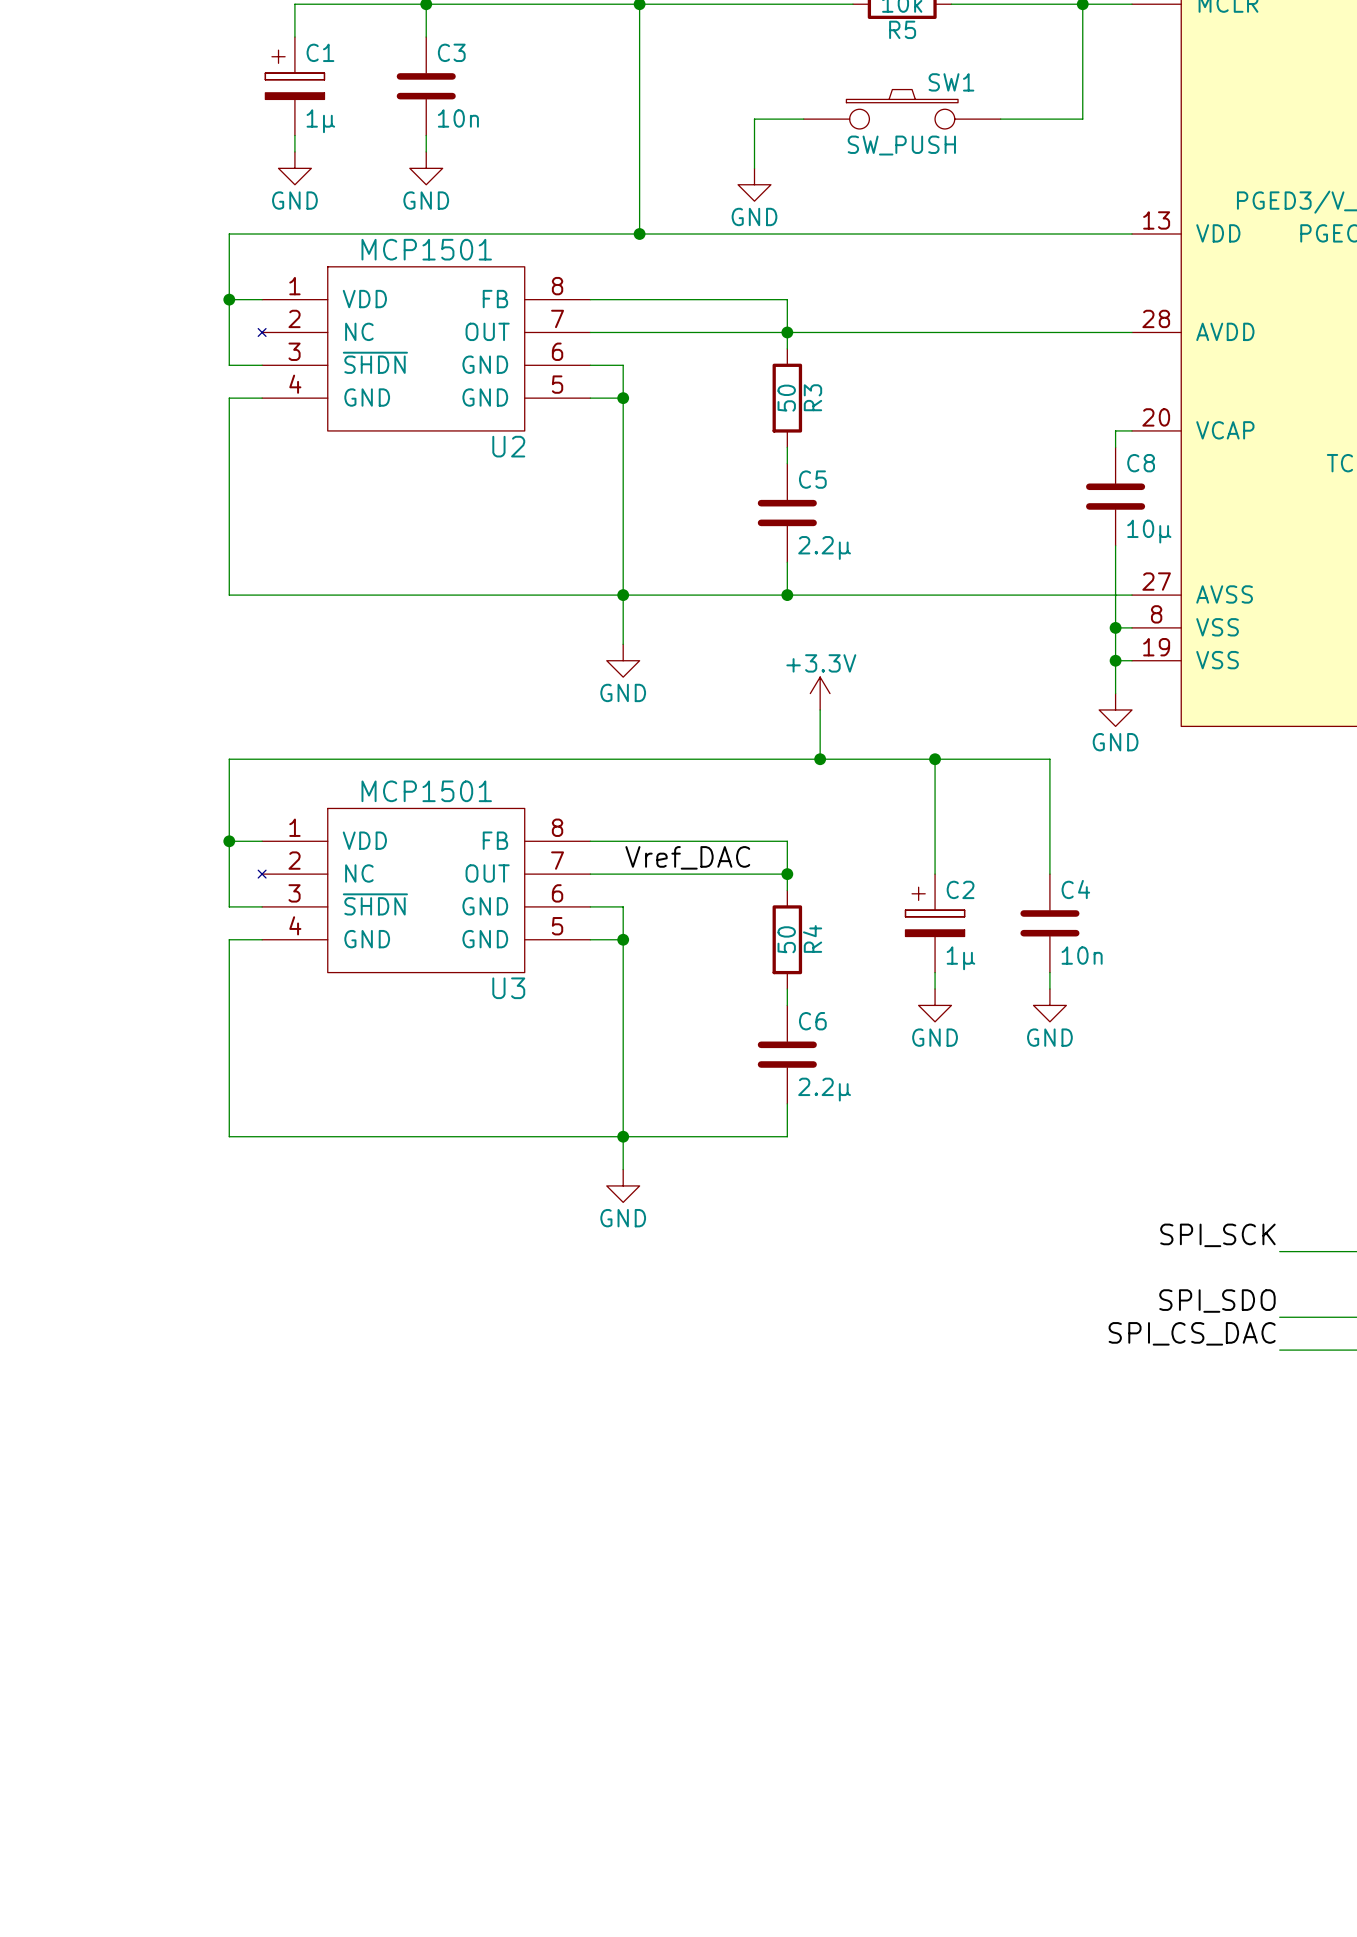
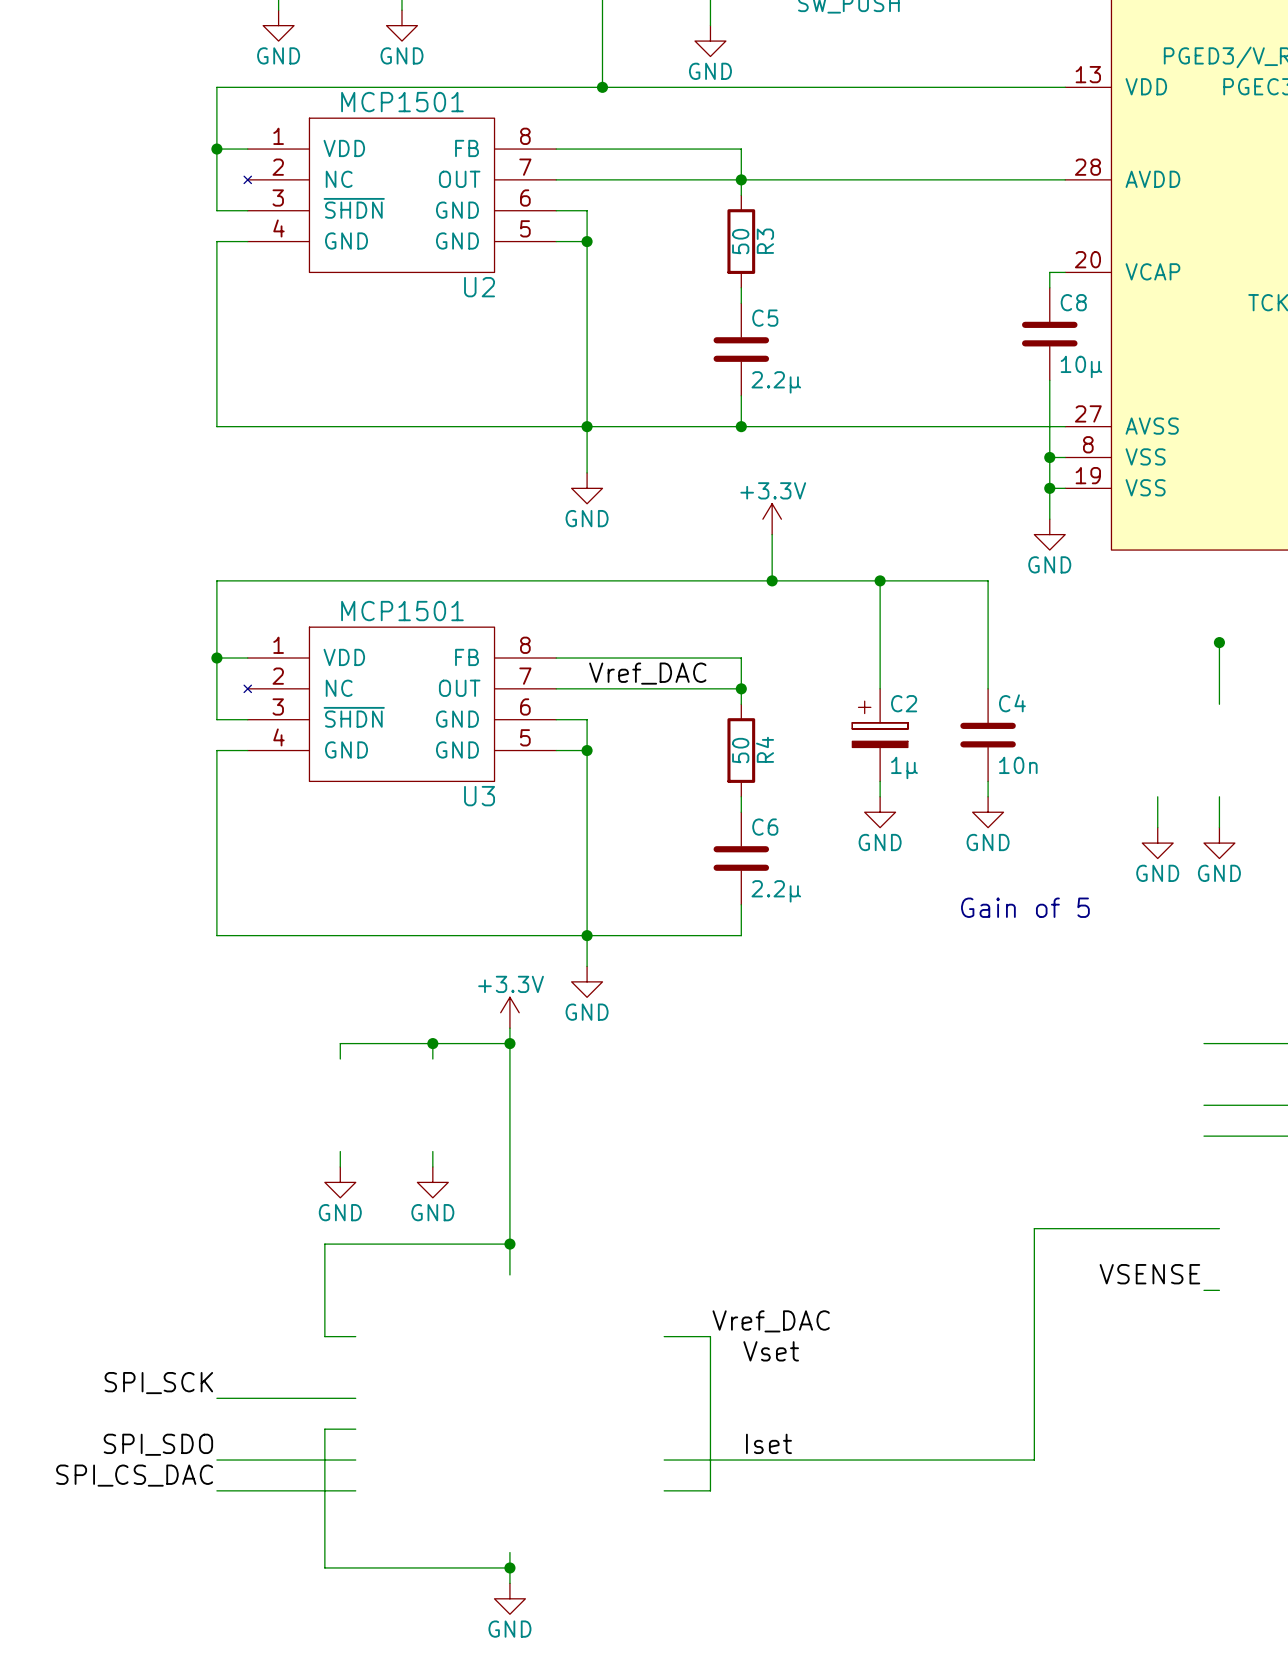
wire: none -> (1219, 642) (1219, 704)
junction: none -> (1219, 642)
wire: none -> (1157, 796) (1157, 827)
wire: none -> (1219, 796) (1219, 827)
power symbol: none -> GND (1157, 843)
power symbol: none -> GND (1219, 843)
text: none -> Gain of 5 (1025, 907)
power symbol: none -> +3.3V (509, 1012)
wire: none -> (509, 1028) (509, 1274)
label: SPI_SCK (1217, 1235) -> none
wire: none -> (432, 1043) (432, 1059)
junction: none -> (432, 1043)
wire: none -> (509, 1043) (340, 1043) (340, 1059)
junction: none -> (509, 1043)
label: SPI_SDO (1217, 1301) -> none
label: SPI_CS_DAC (1192, 1333) -> none
wire: none -> (340, 1151) (340, 1166)
wire: none -> (432, 1151) (432, 1166)
power symbol: none -> GND (340, 1182)
power symbol: none -> GND (432, 1182)
wire: none -> (1219, 1228) (1034, 1228) (1034, 1460) (664, 1460)
wire: none -> (509, 1244) (324, 1244) (324, 1336) (355, 1336)
junction: none -> (509, 1244)
label: none -> VSENSE (1149, 1274)
wire: none -> (1204, 1290) (1219, 1290)
label: none -> Vref_DAC (771, 1321)
wire: none -> (664, 1336) (710, 1336) (710, 1490) (664, 1490)
label: none -> Vset (771, 1351)
label: none -> SPI_SCK (158, 1383)
wire: none -> (216, 1398) (355, 1398)
wire: none -> (355, 1429) (324, 1429) (324, 1567) (509, 1567)
label: none -> Iset (768, 1443)
label: none -> SPI_SDO (158, 1444)
wire: none -> (216, 1460) (355, 1460)
label: none -> SPI_CS_DAC (134, 1475)
wire: none -> (216, 1490) (355, 1490)
wire: none -> (509, 1552) (509, 1583)
junction: none -> (509, 1567)
power symbol: none -> GND (509, 1598)

